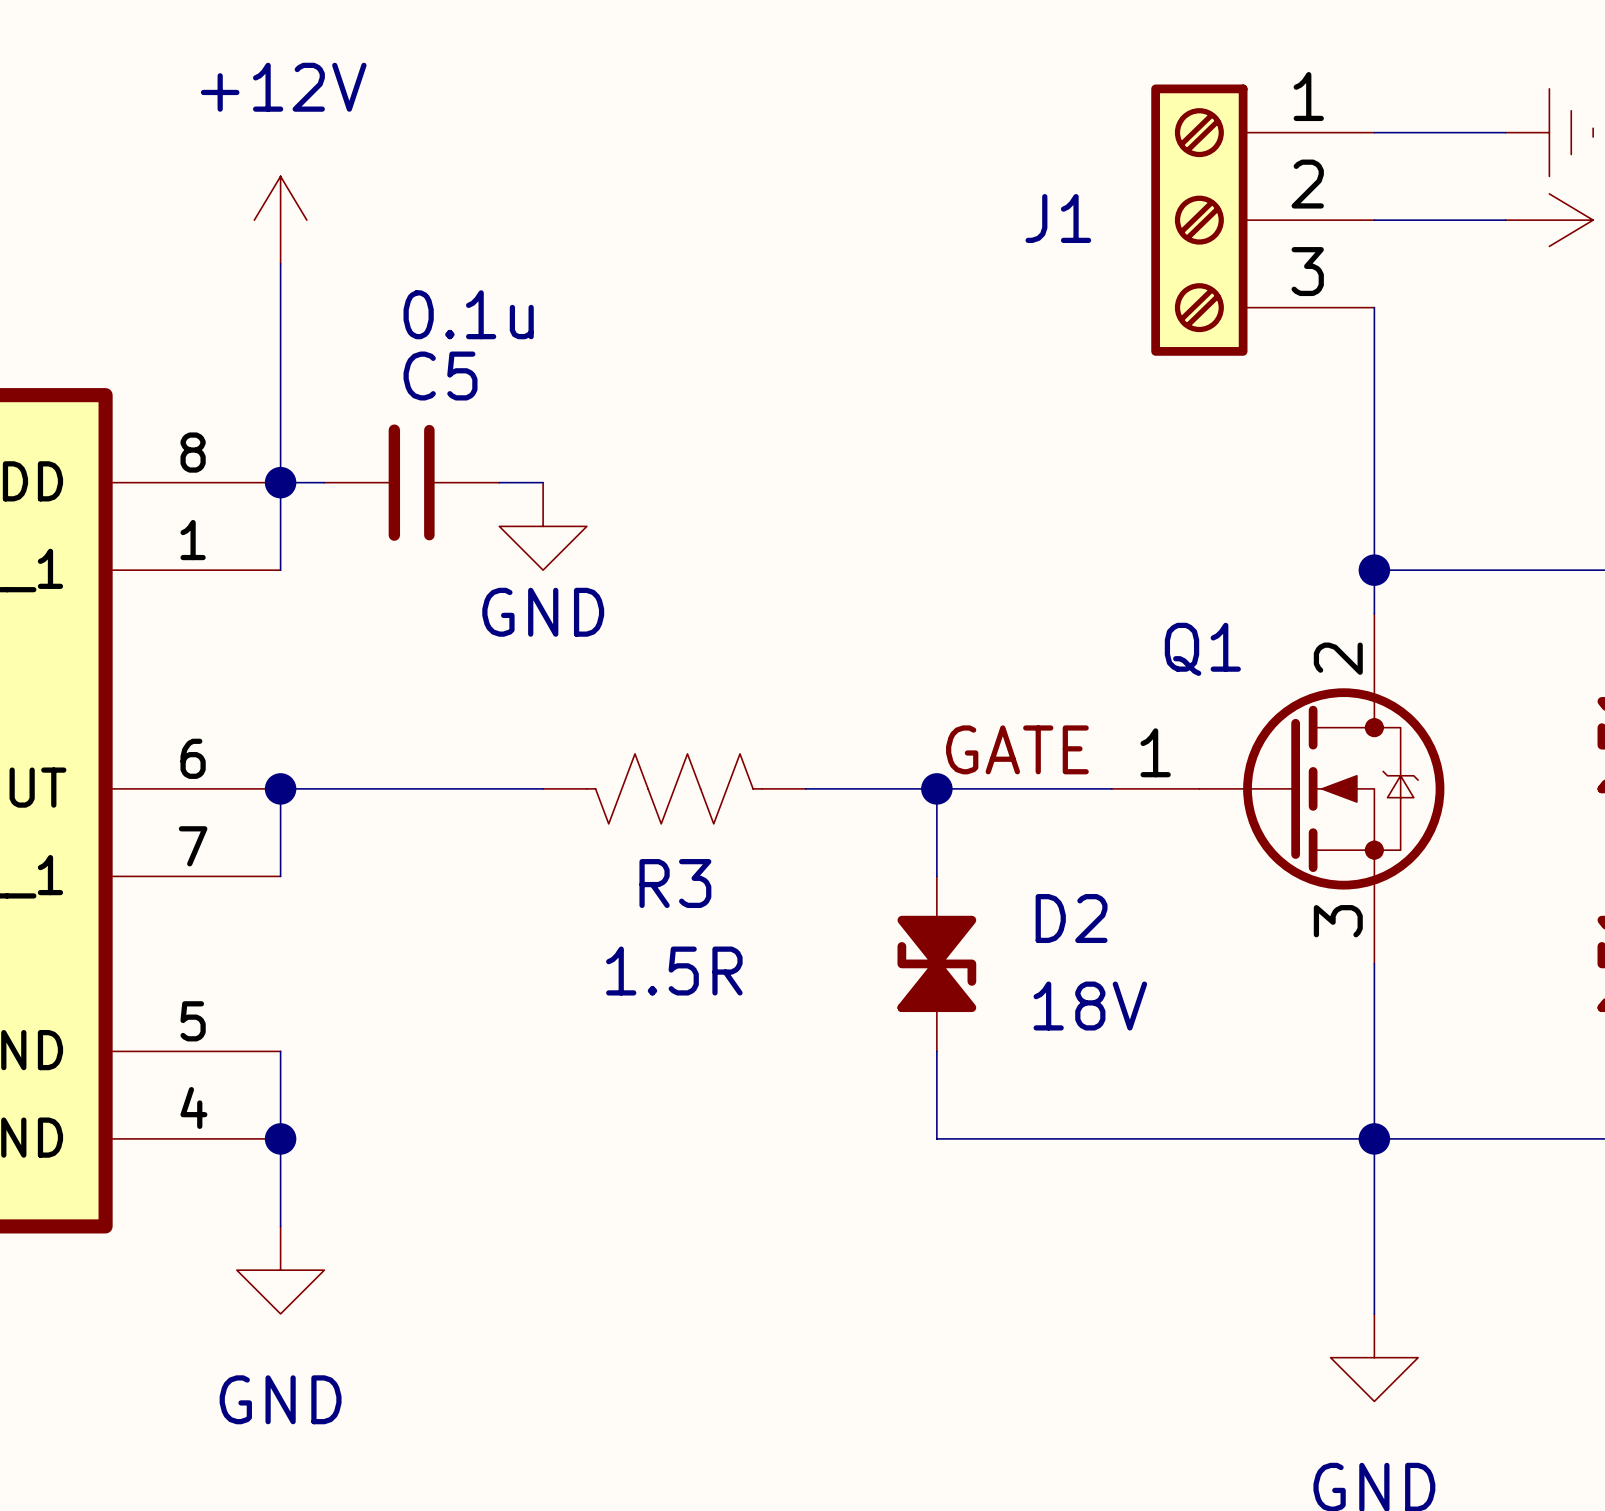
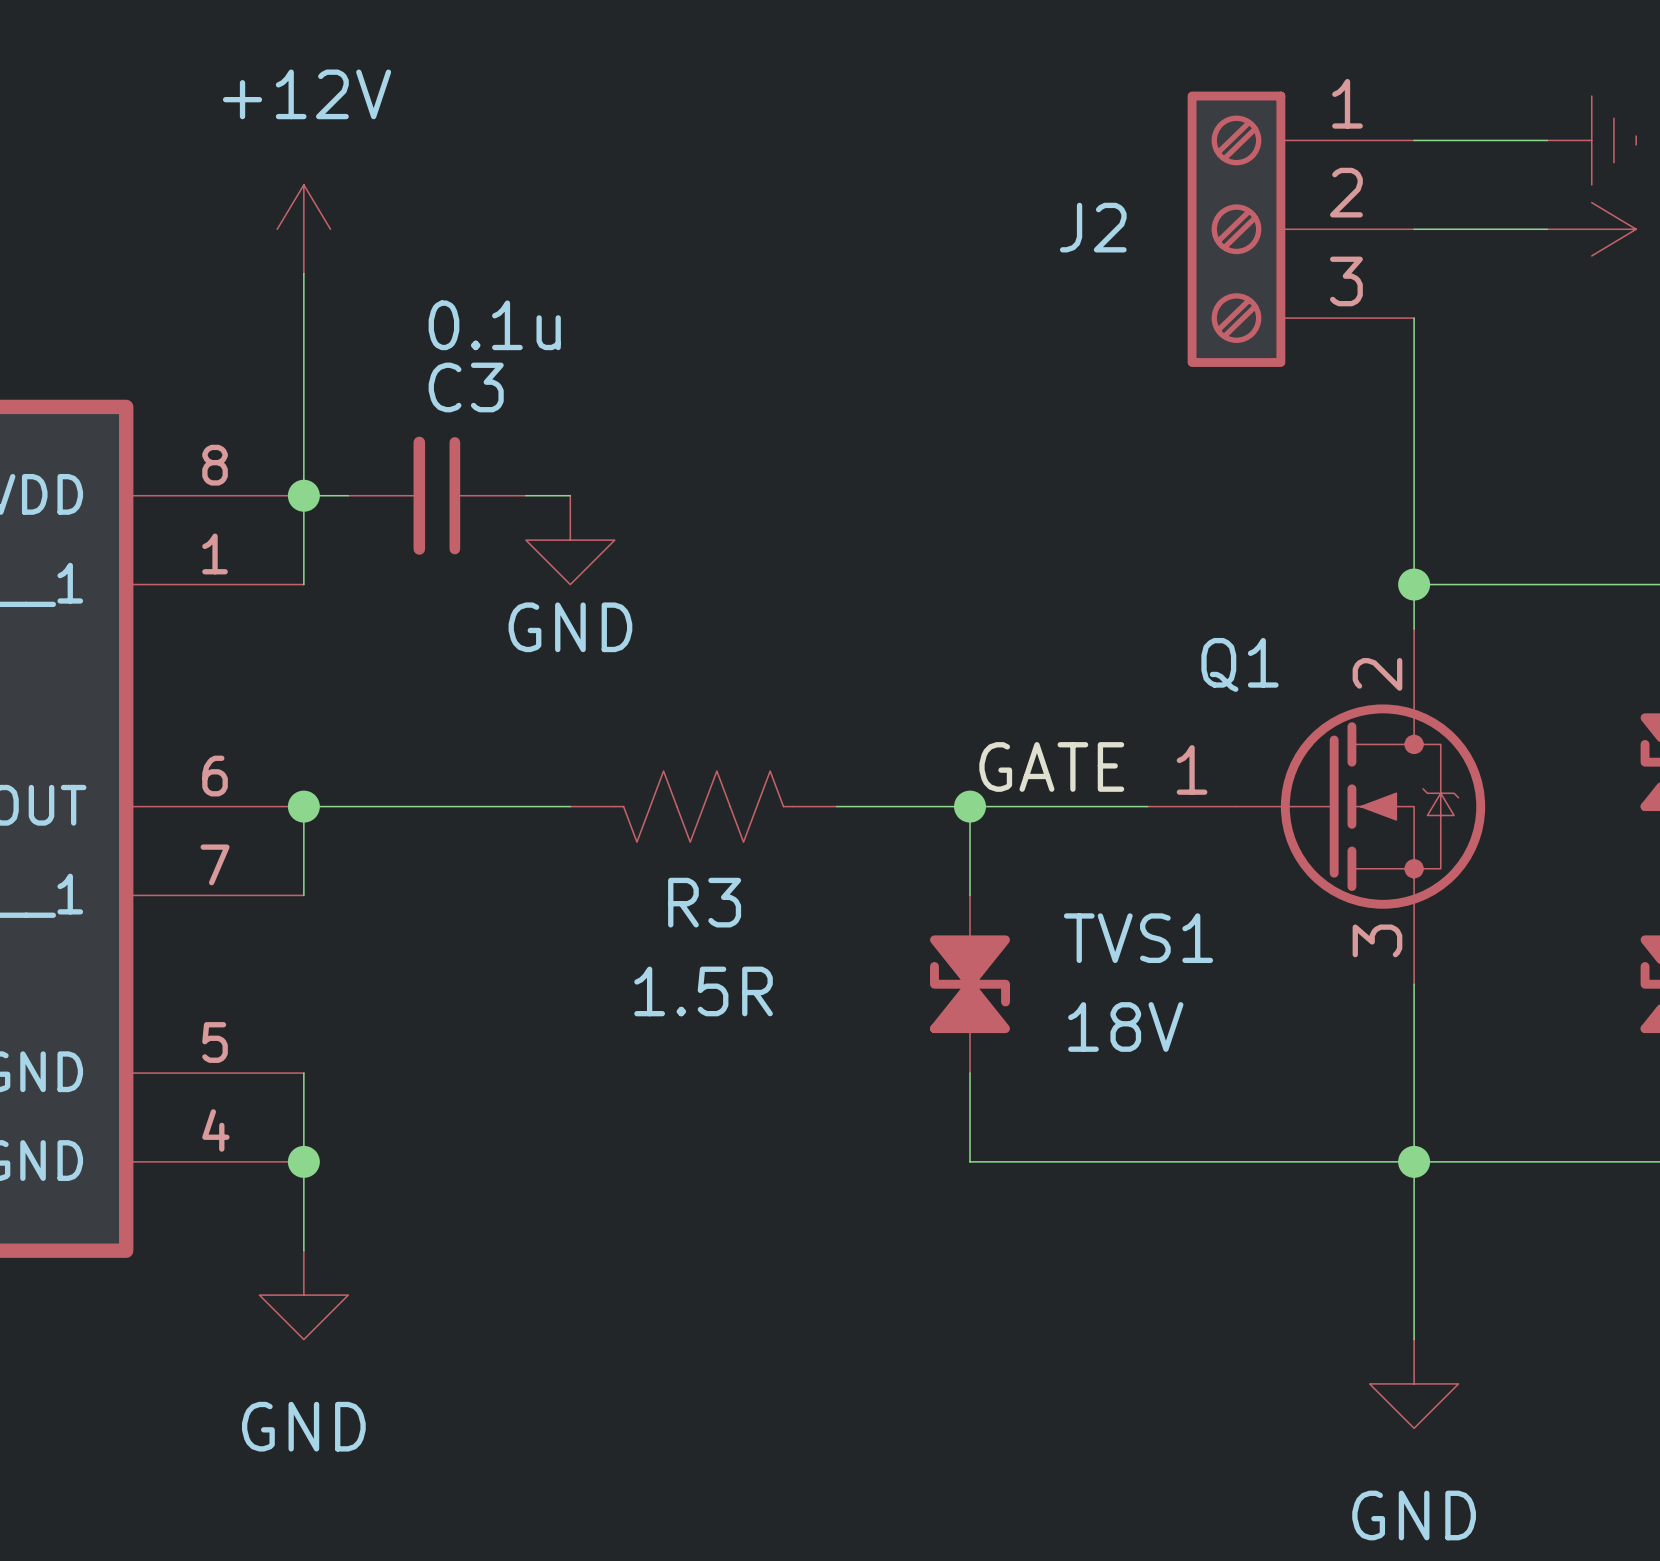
J1 name: J1 (1058, 218) -> J2 (1093, 227)
C5 name: C5 (440, 376) -> C3 (466, 387)
D2 name: D2 (1071, 918) -> TVS1 (1138, 938)

